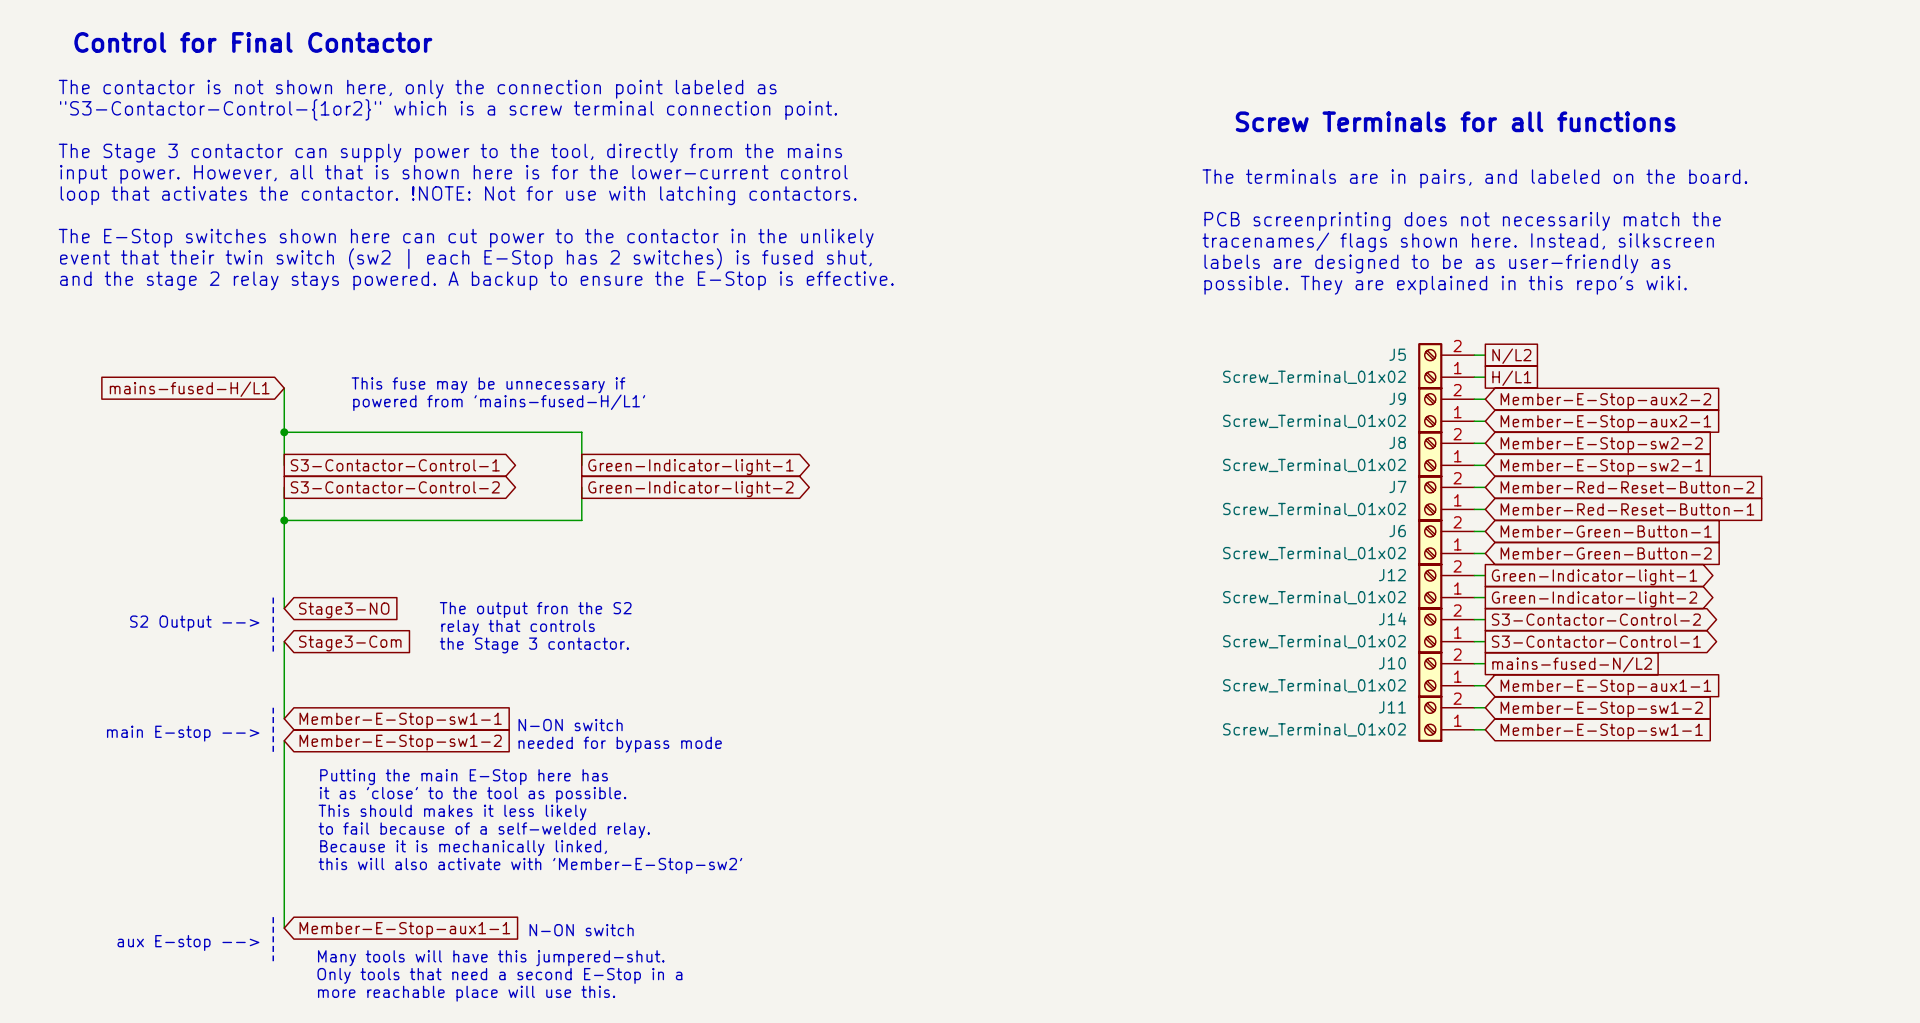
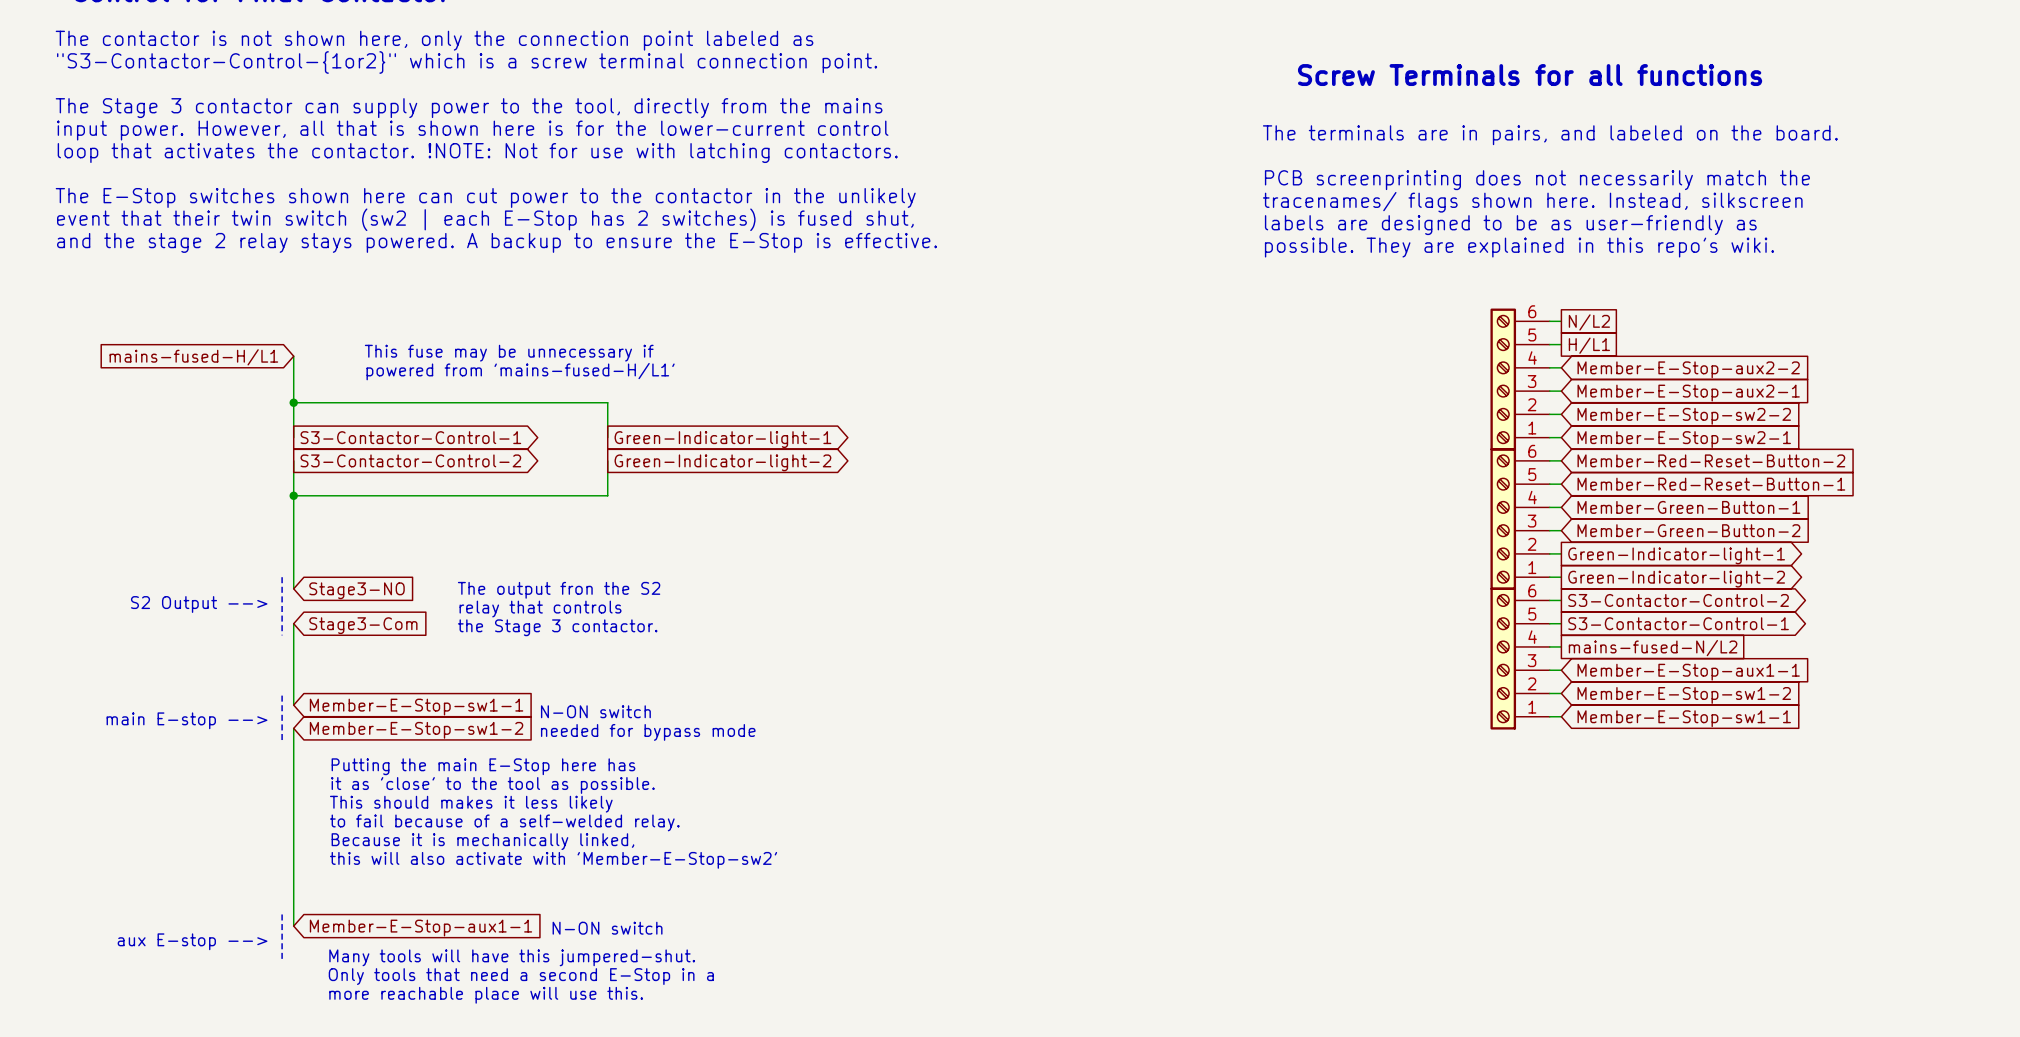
J5: Screw_Terminal_01x02 (1446, 366) -> none
J9: Screw_Terminal_01x02 (1446, 410) -> none
part: none -> (1520, 379)
J8: Screw_Terminal_01x02 (1446, 454) -> none
J7: Screw_Terminal_01x02 (1446, 498) -> none
J6: Screw_Terminal_01x02 (1446, 542) -> none
part: none -> (1520, 519)
J12: Screw_Terminal_01x02 (1446, 586) -> none
J14: Screw_Terminal_01x02 (1446, 630) -> none
J10: Screw_Terminal_01x02 (1446, 674) -> none
part: none -> (1520, 658)
J11: Screw_Terminal_01x02 (1446, 718) -> none

